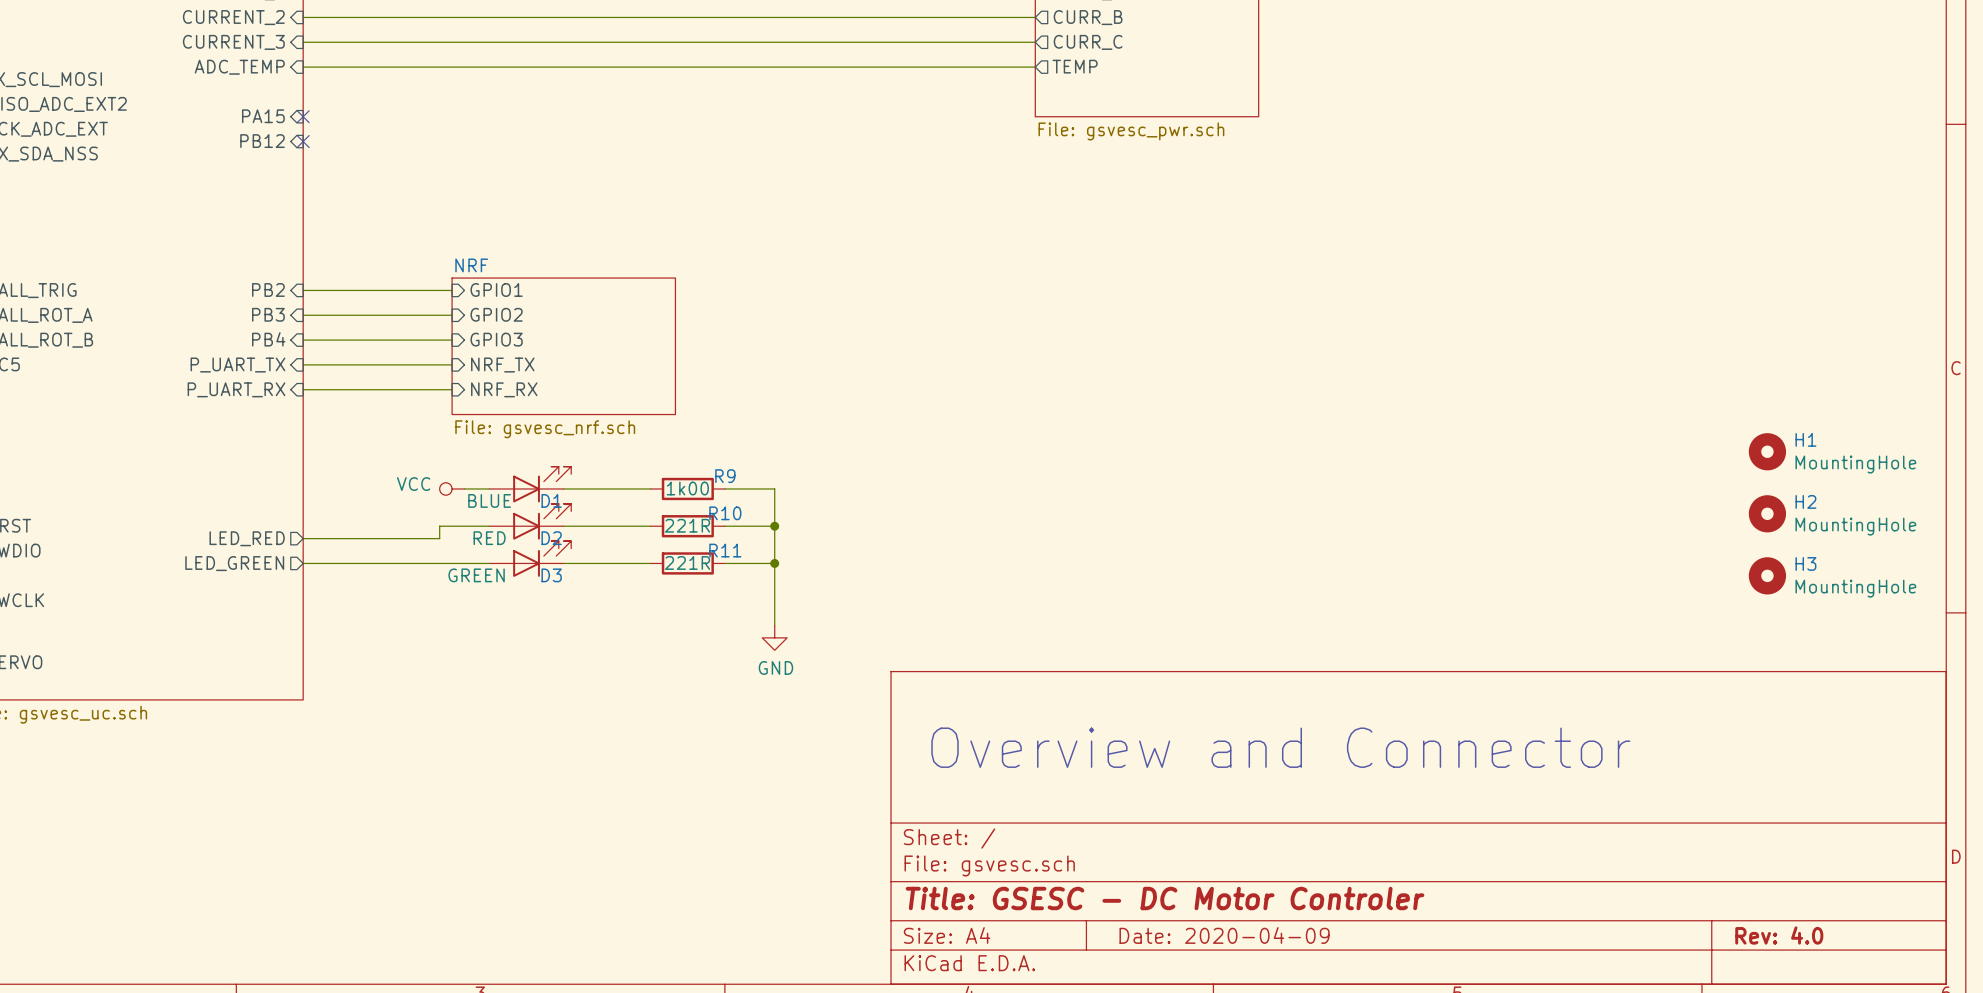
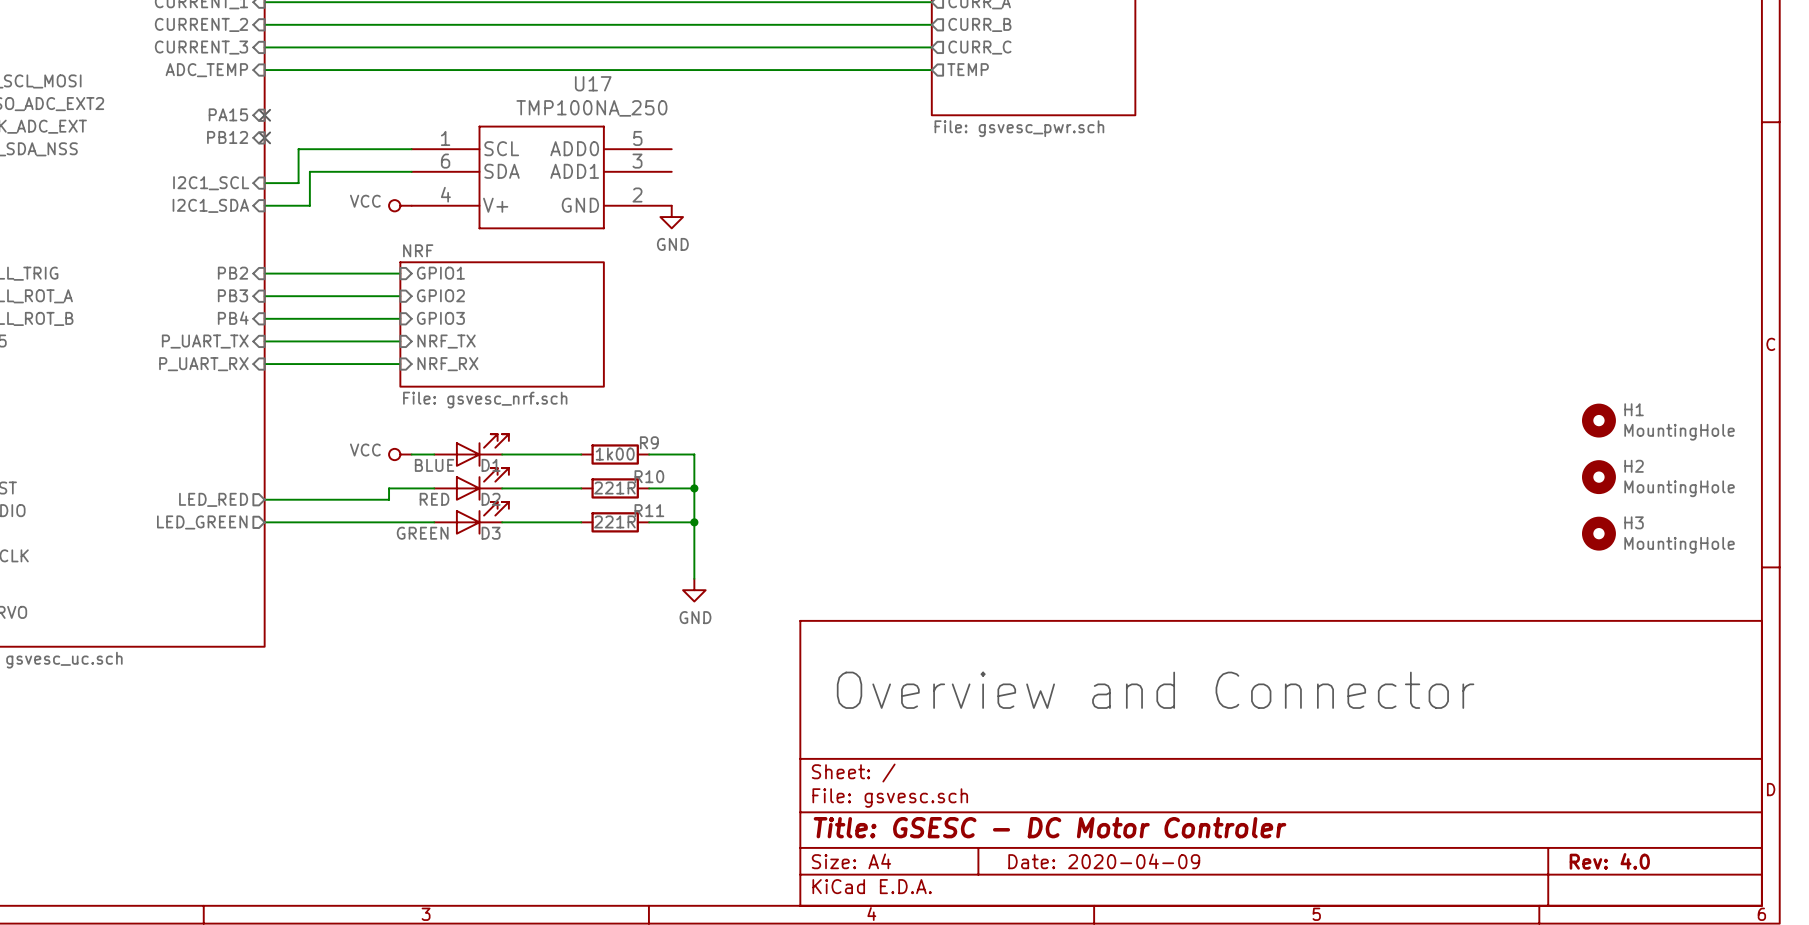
wire: none -> (411, 149) (298, 149) (298, 183) (264, 183)
wire: none -> (411, 171) (309, 171) (309, 205) (264, 205)
U17: none -> TMP100NA_250 (541, 177)
sheet pin: none -> I2C1_SCL (211, 183)
power symbol: none -> VCC (400, 205)
sheet pin: none -> I2C1_SDA (210, 205)
power symbol: none -> GND (671, 217)

